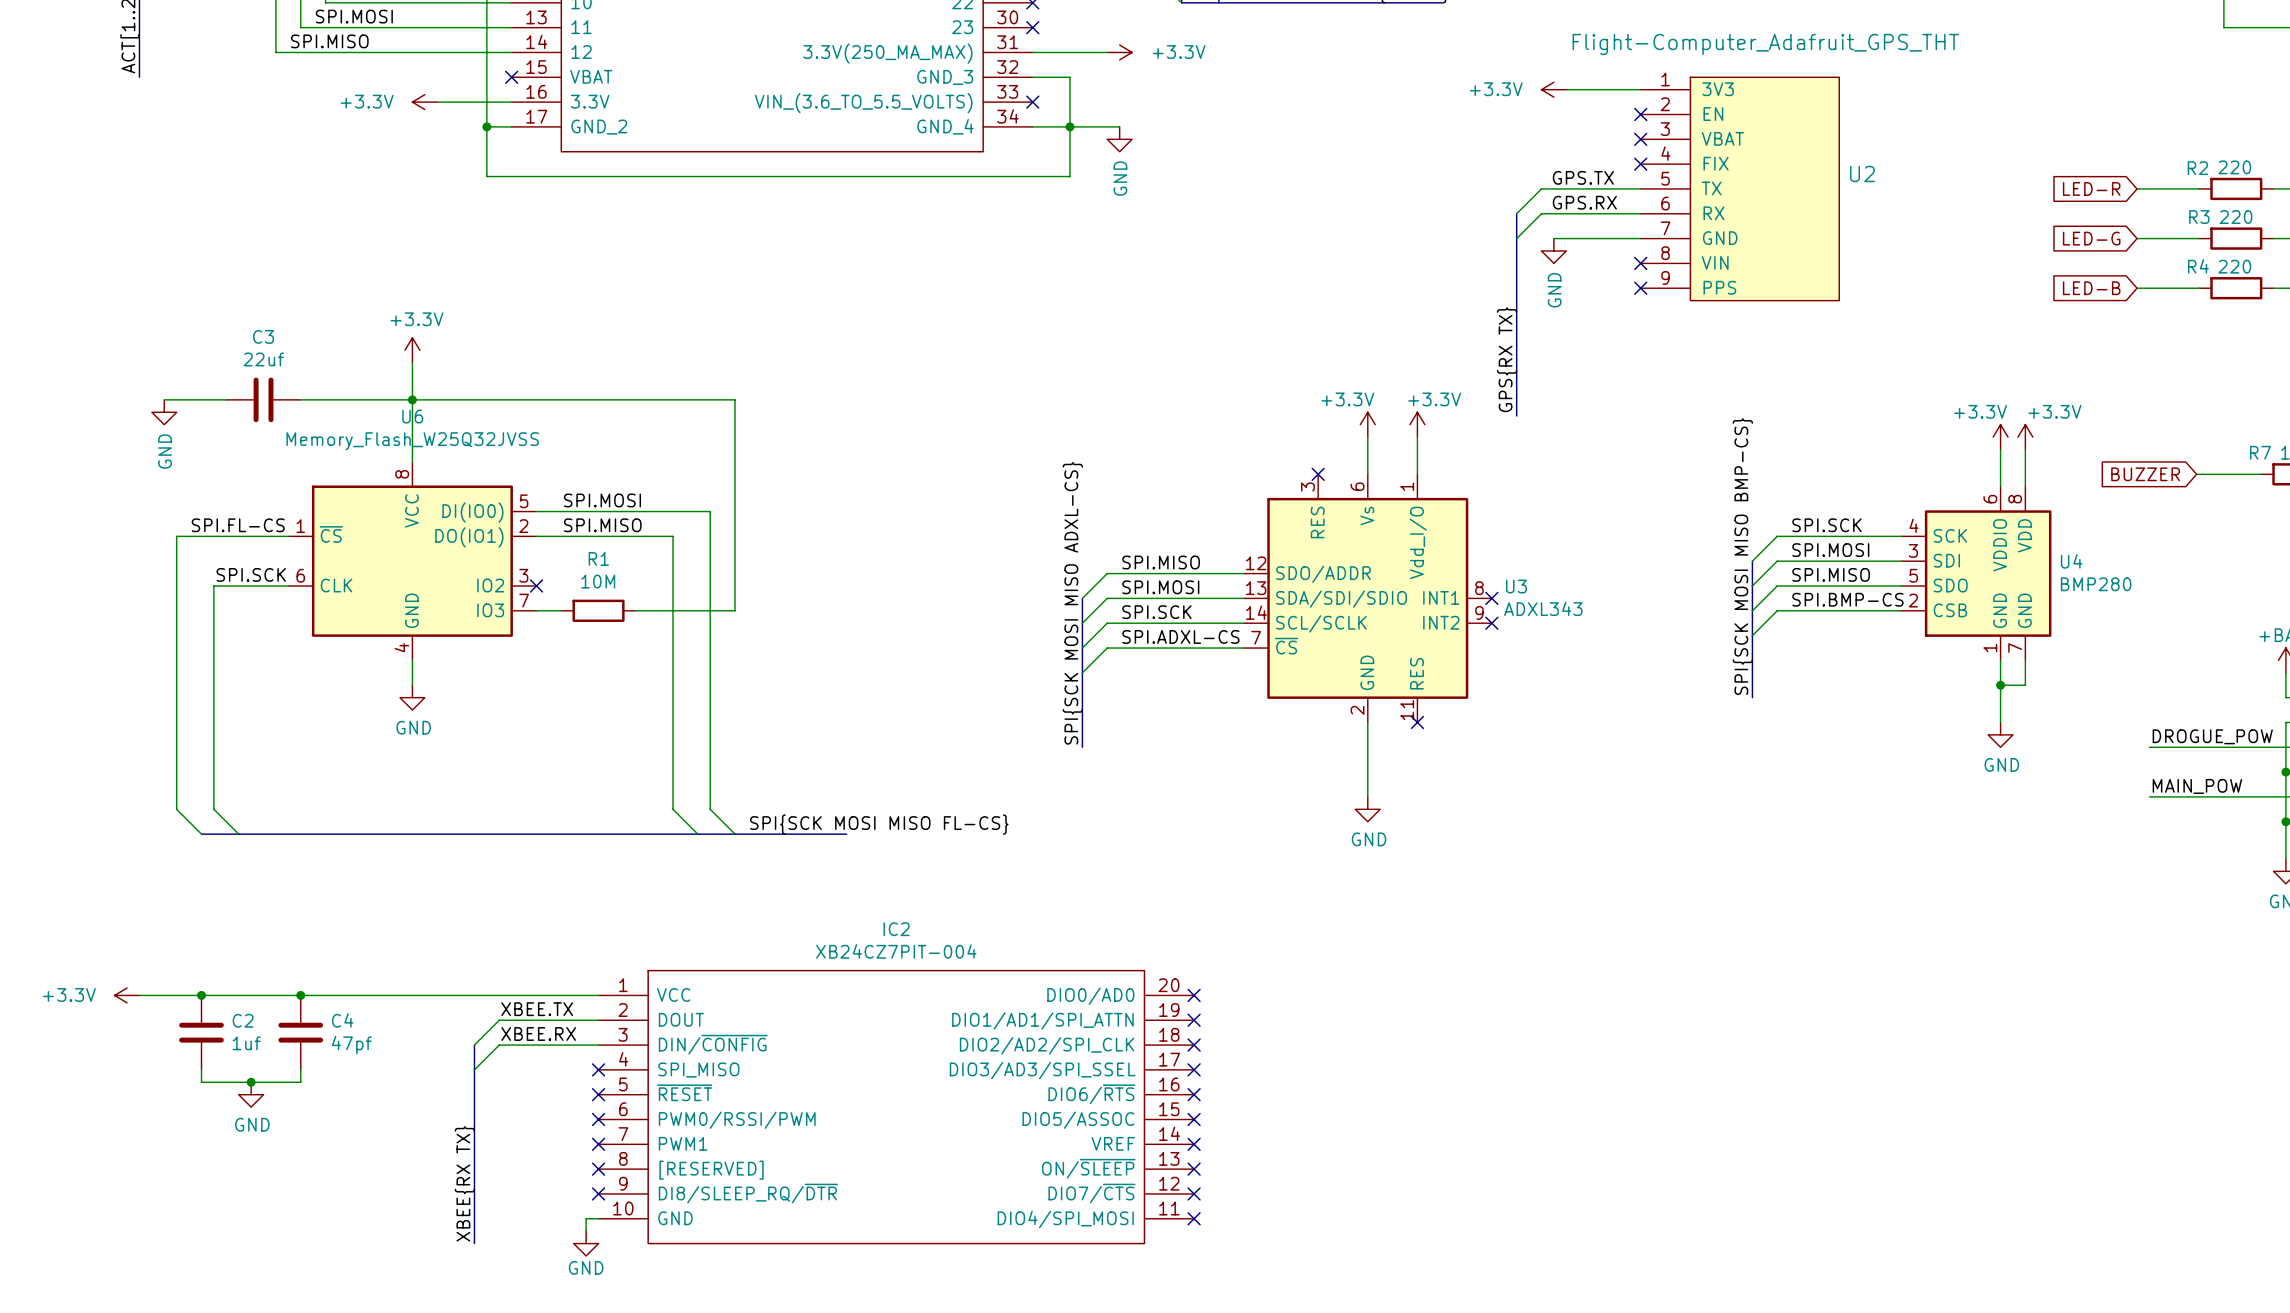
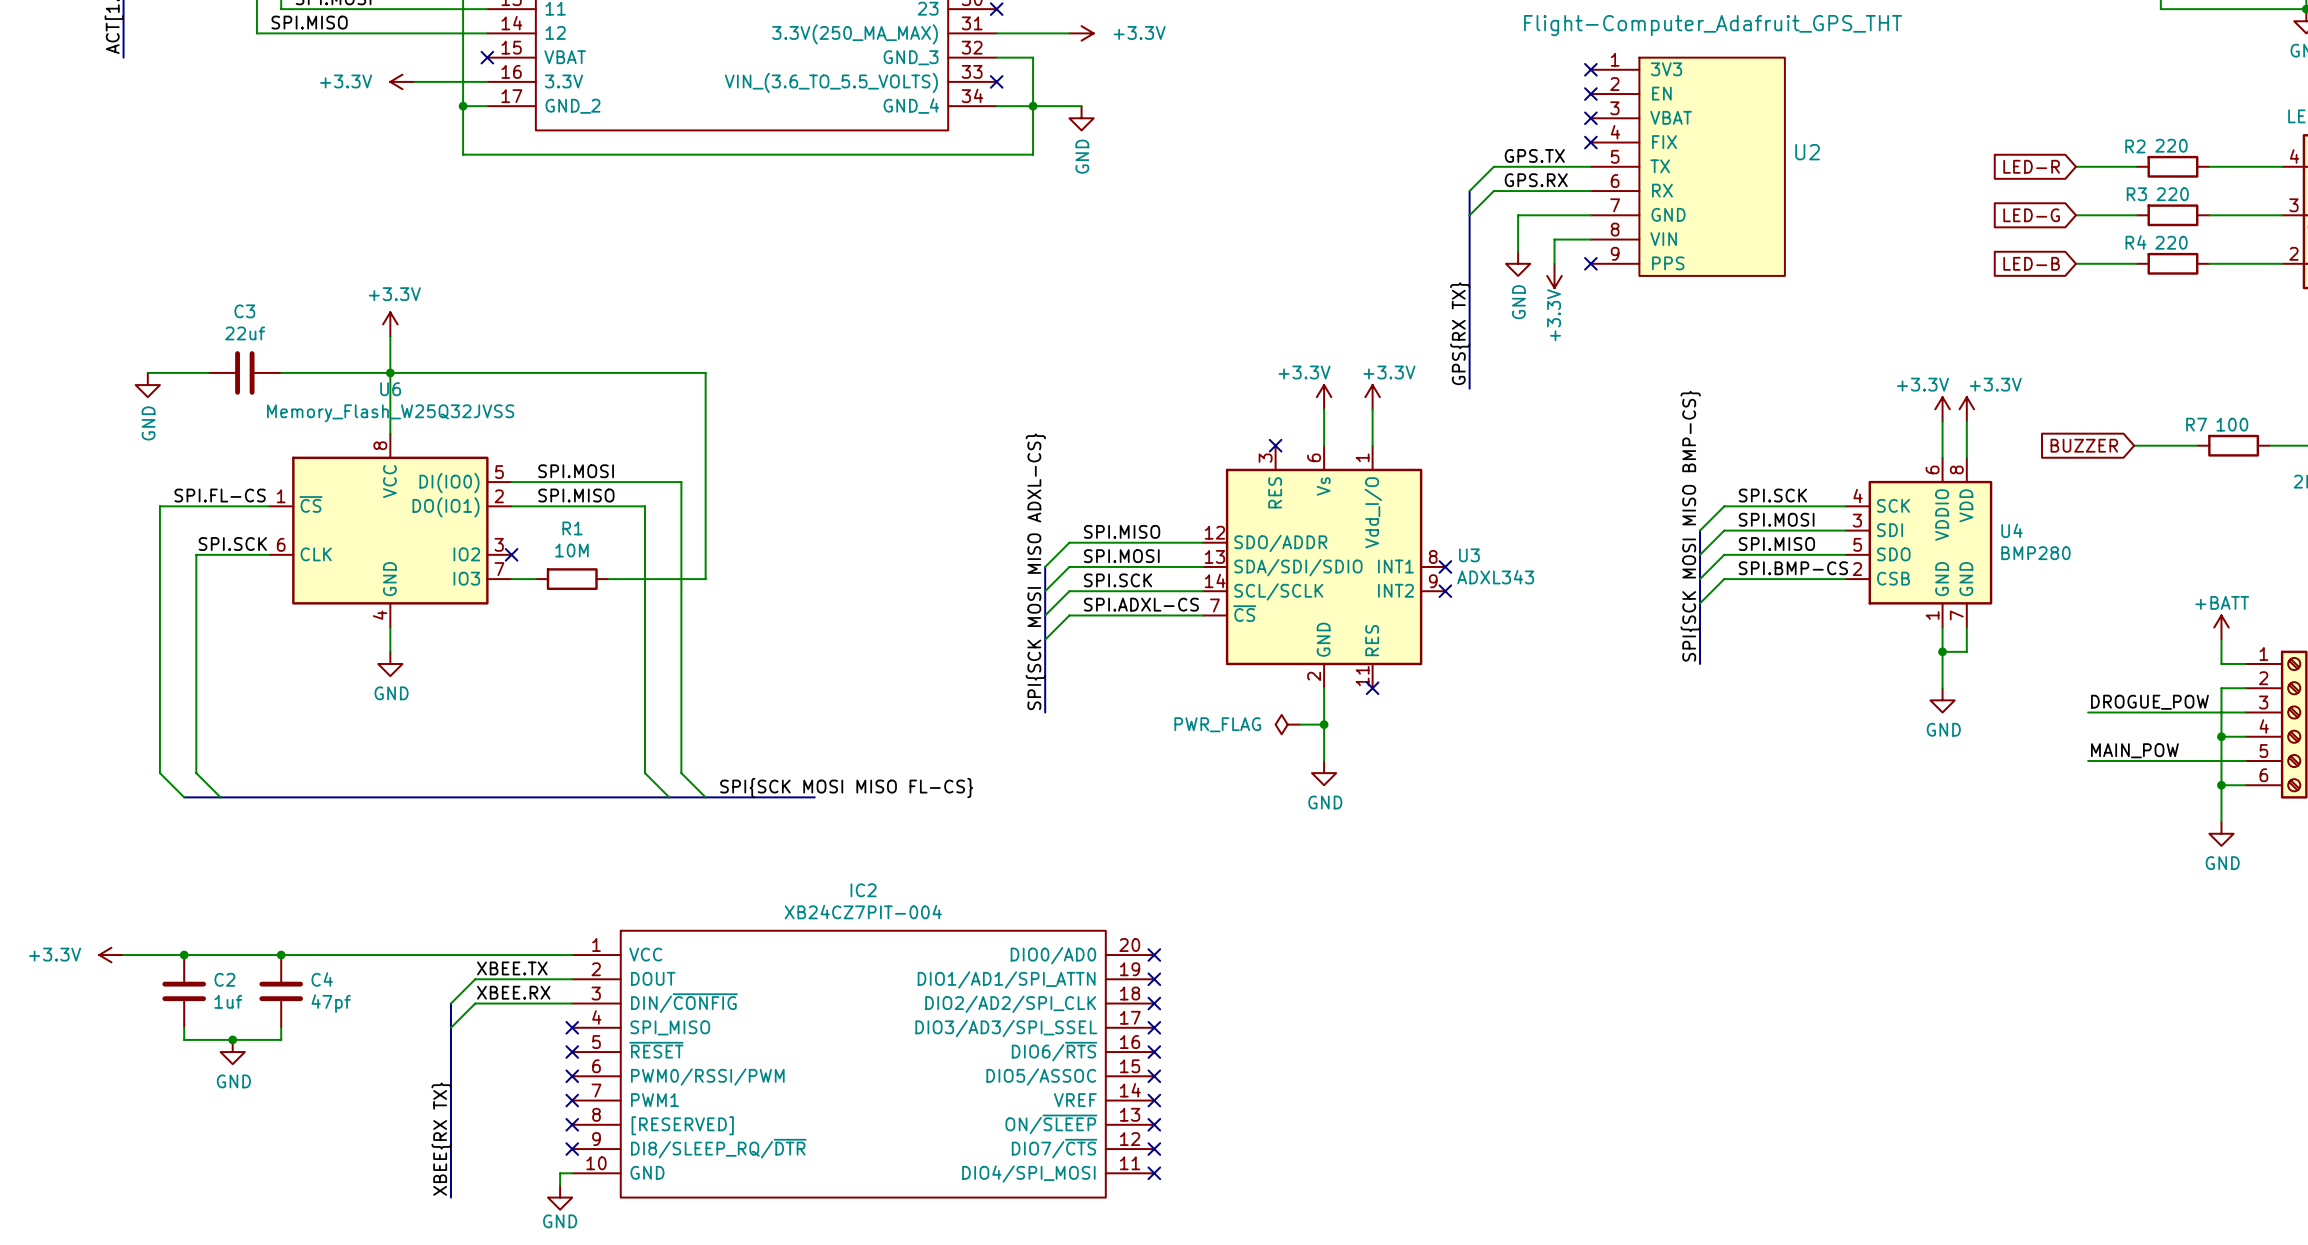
power symbol rotation: 0° (1553, 89) -> 90° counterclockwise (1554, 275)
power symbol position: +3.3V (1553, 89) -> +3.3V (1554, 275)
wire: (1566, 89) (1640, 89) -> none
no-connect mark: none -> (1590, 69)
wire: (1553, 238) (1566, 238) -> (1518, 251) (1518, 215)
power symbol position: GND (1553, 250) -> GND (1518, 263)
wire: none -> (1590, 239) (1554, 239) (1554, 263)
no-connect mark: (1640, 263) -> none
power symbol: none -> PWR_FLAG (1287, 724)
wire: none -> (1299, 724) (1324, 724)
junction: none -> (1324, 724)

